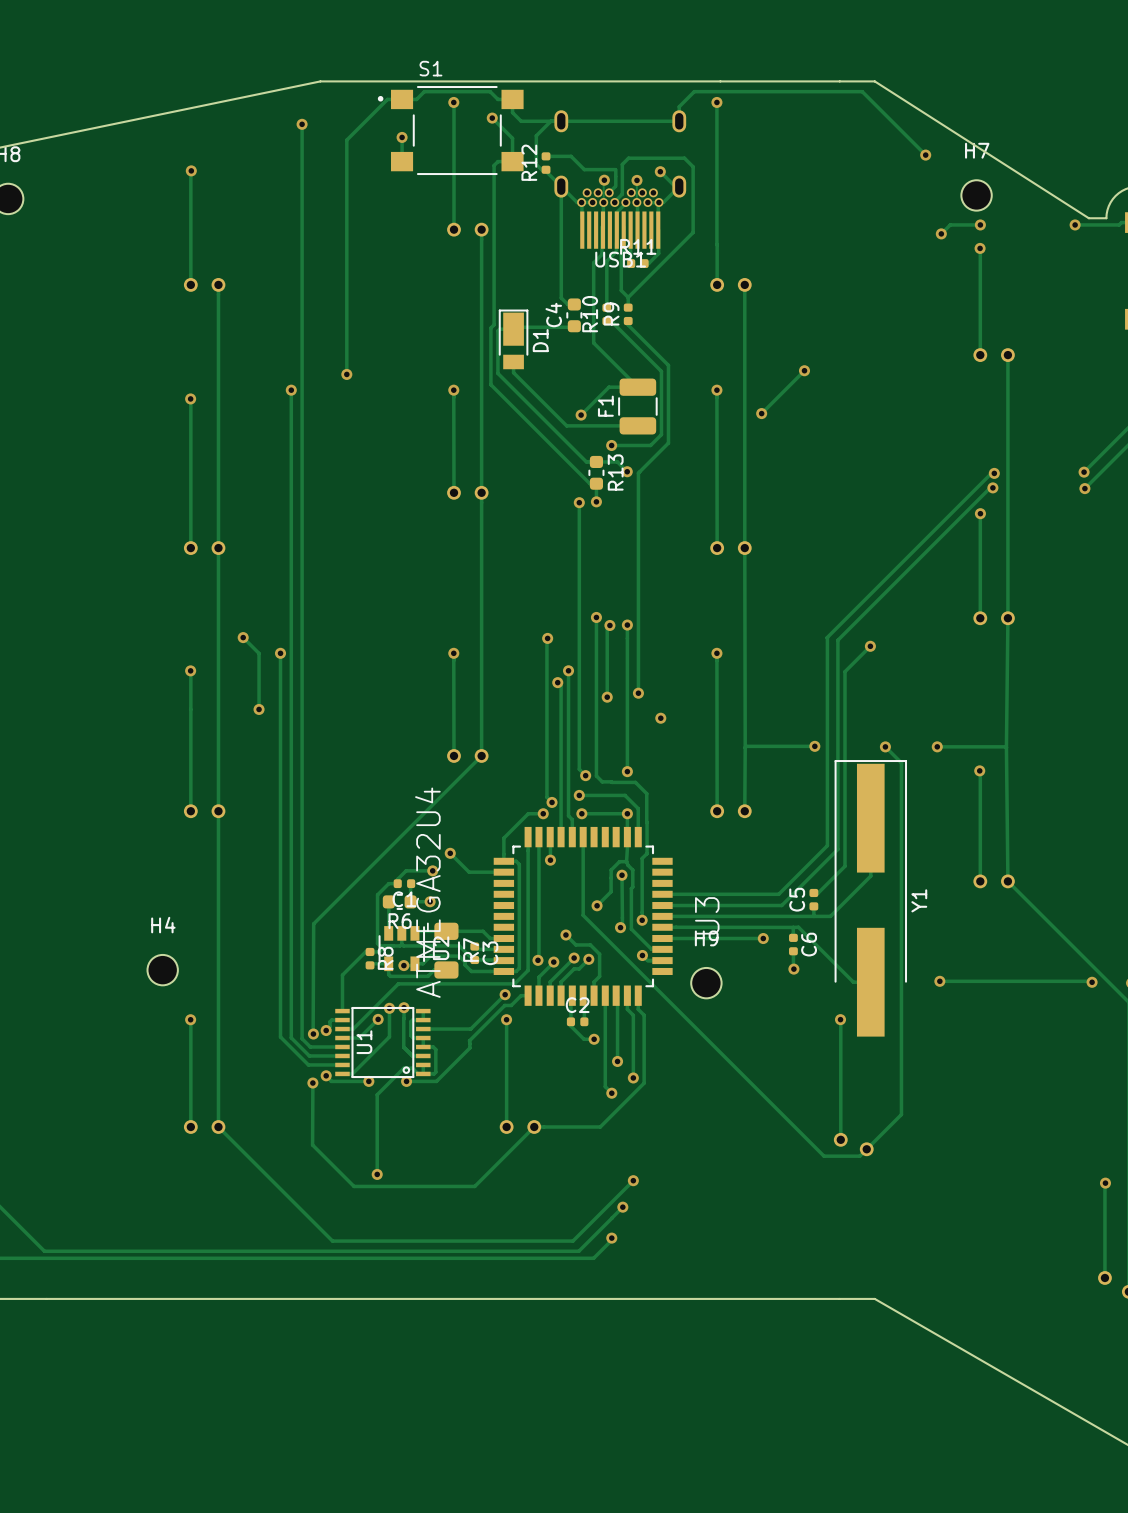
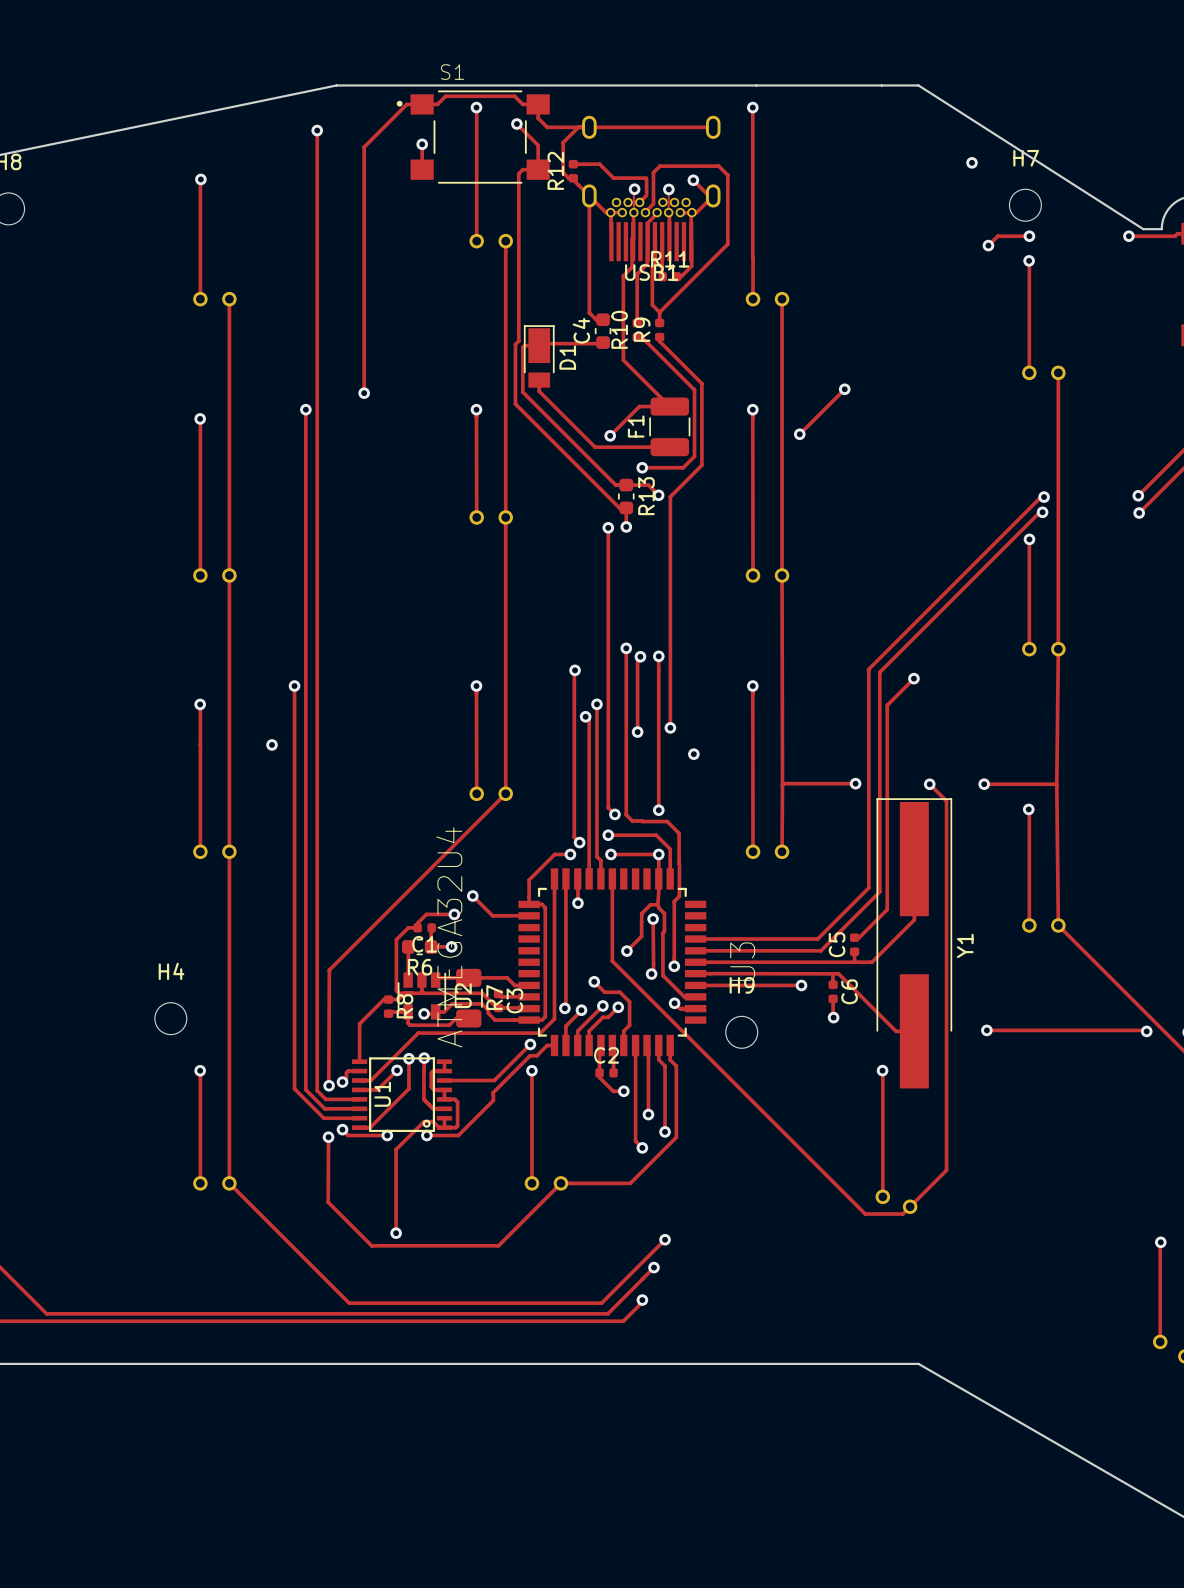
track: (679, 121) (679, 106) (694, 91) (862, 91) (925, 155) -> none
track: (243, 637) (259, 653) (259, 709) -> none
via: (243, 637) -> none

